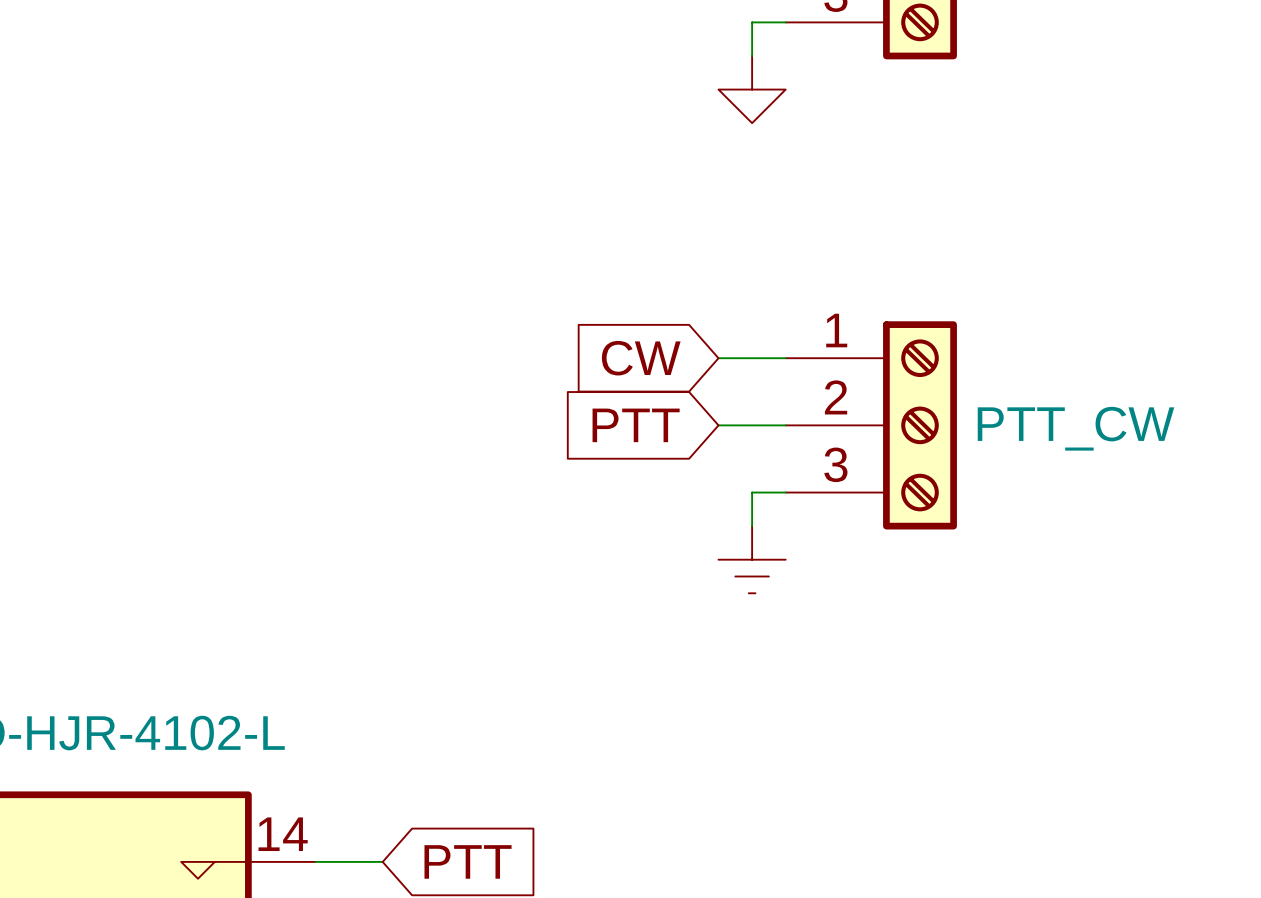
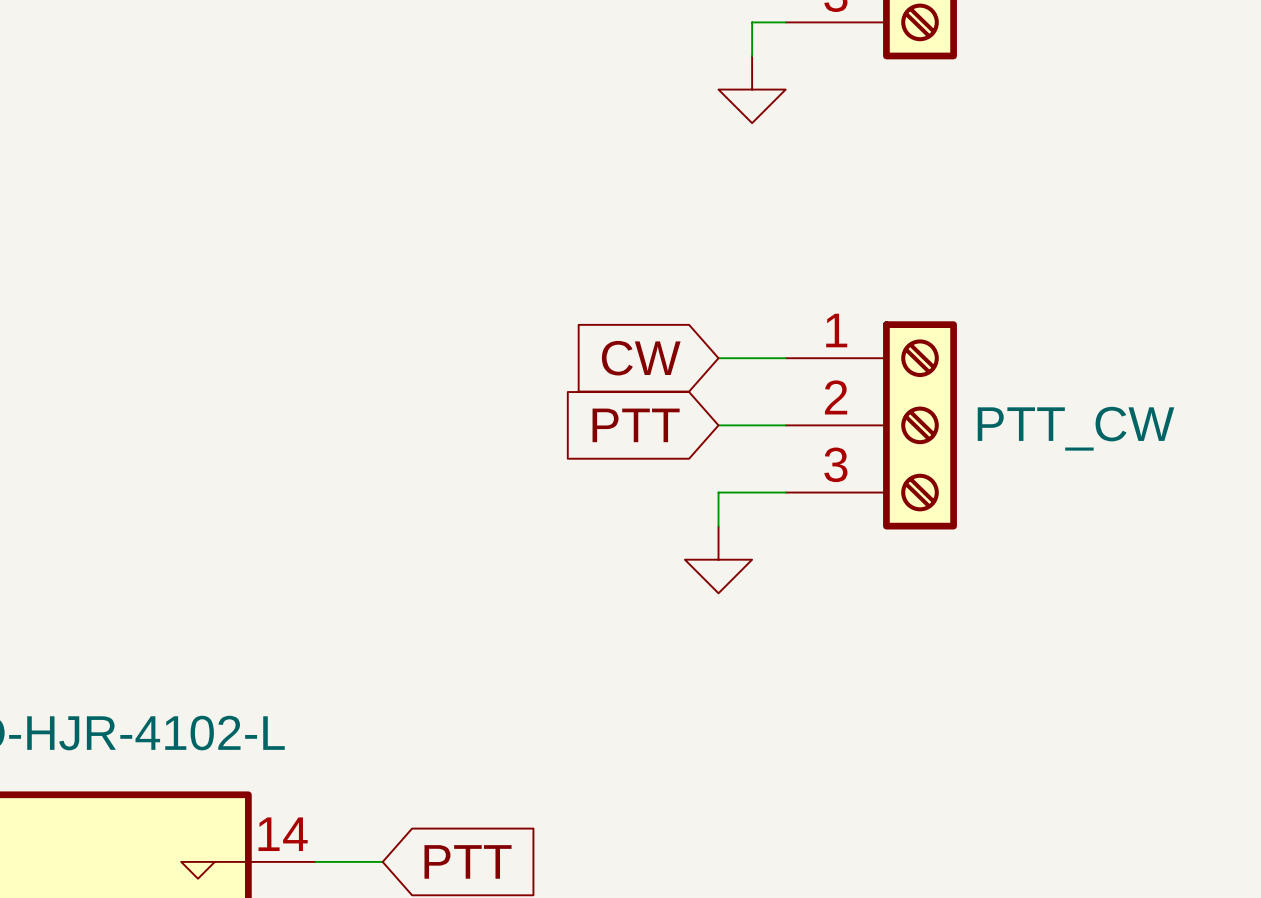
wire: (752, 492) (752, 526) -> (752, 492) (718, 492) (718, 526)
power symbol: none -> (718, 559)
power symbol: (752, 559) -> none

